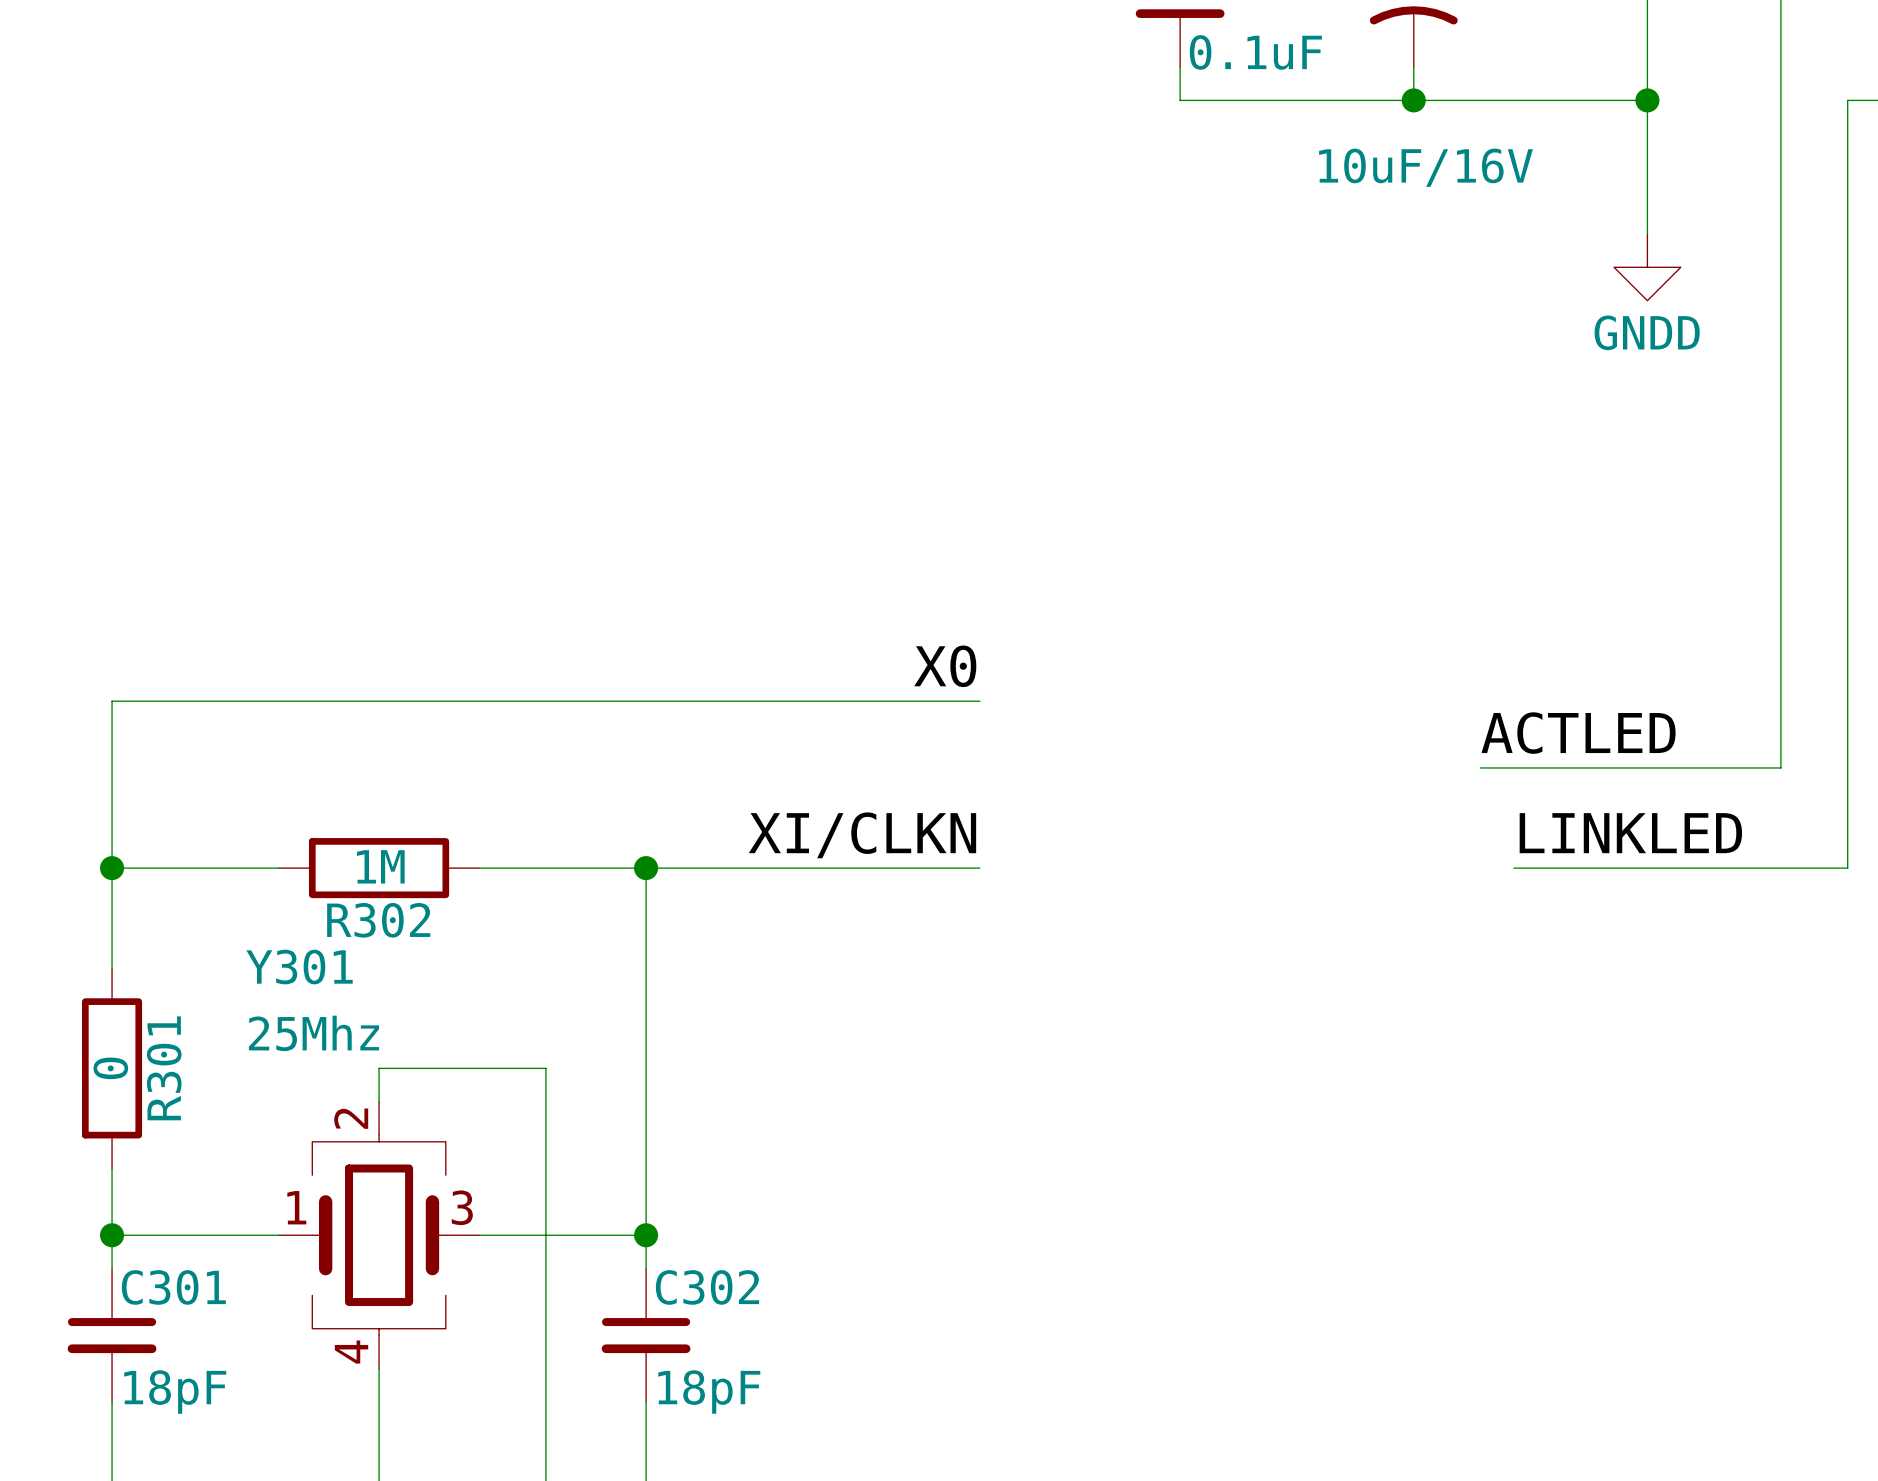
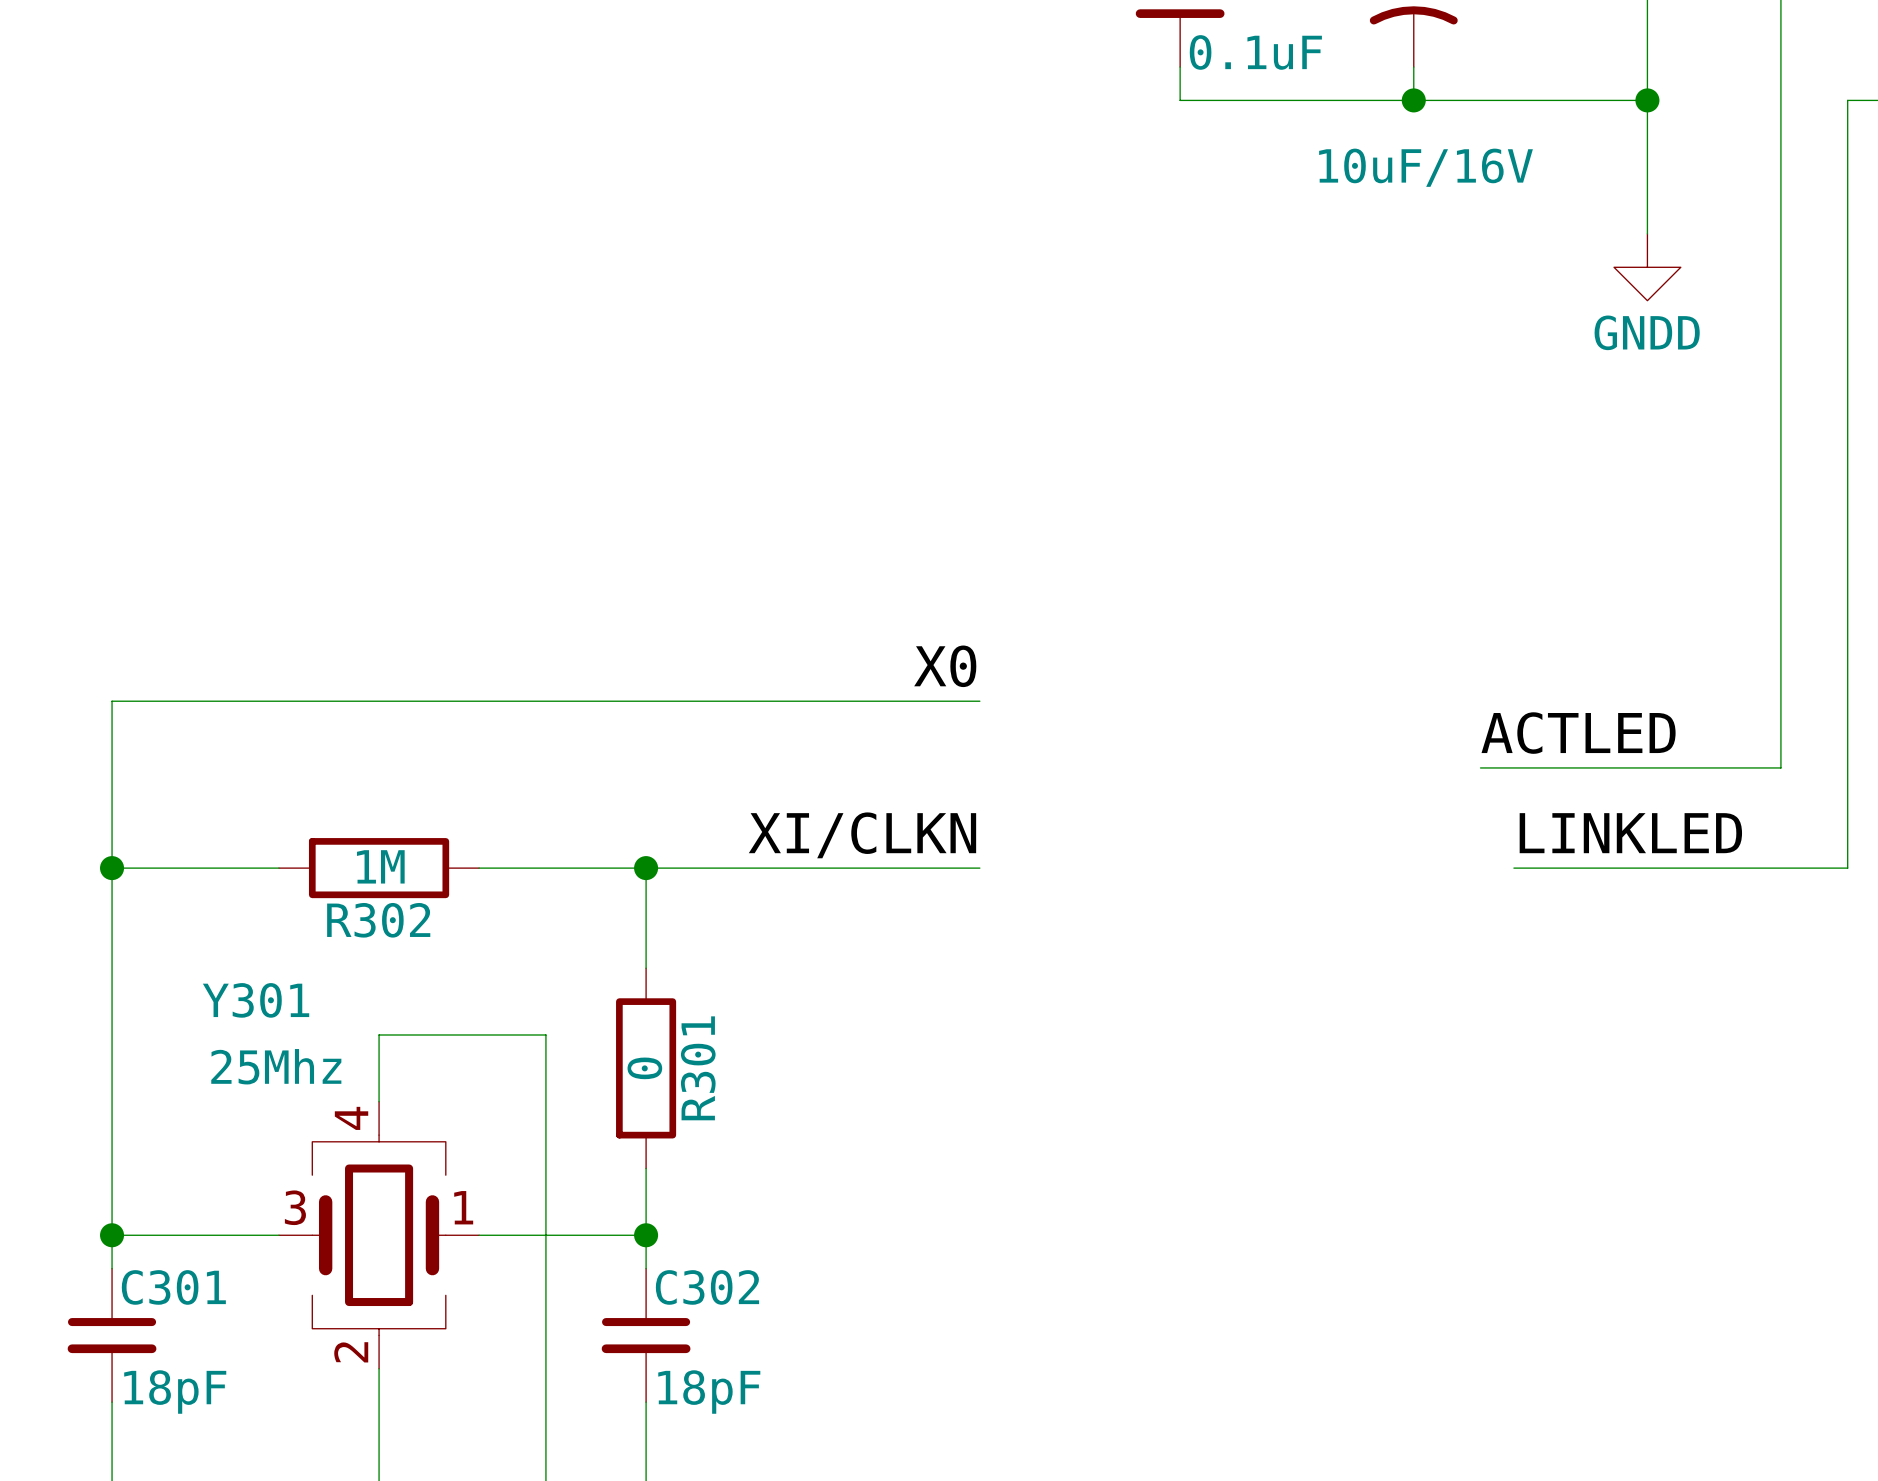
Y301 name position: Y301 (299, 967) -> Y301 (256, 1000)
wire: (646, 968) (646, 1168) -> (112, 968) (112, 1168)
Y301 value position: 25Mhz (313, 1033) -> 25Mhz (276, 1066)
R301 position: (112, 1068) -> (646, 1068)
wire: (379, 1068) (545, 1068) -> (379, 1068) (379, 1034) (545, 1034) (545, 1068)
Y301 rotation: 0° (379, 1235) -> 180° (379, 1235)

